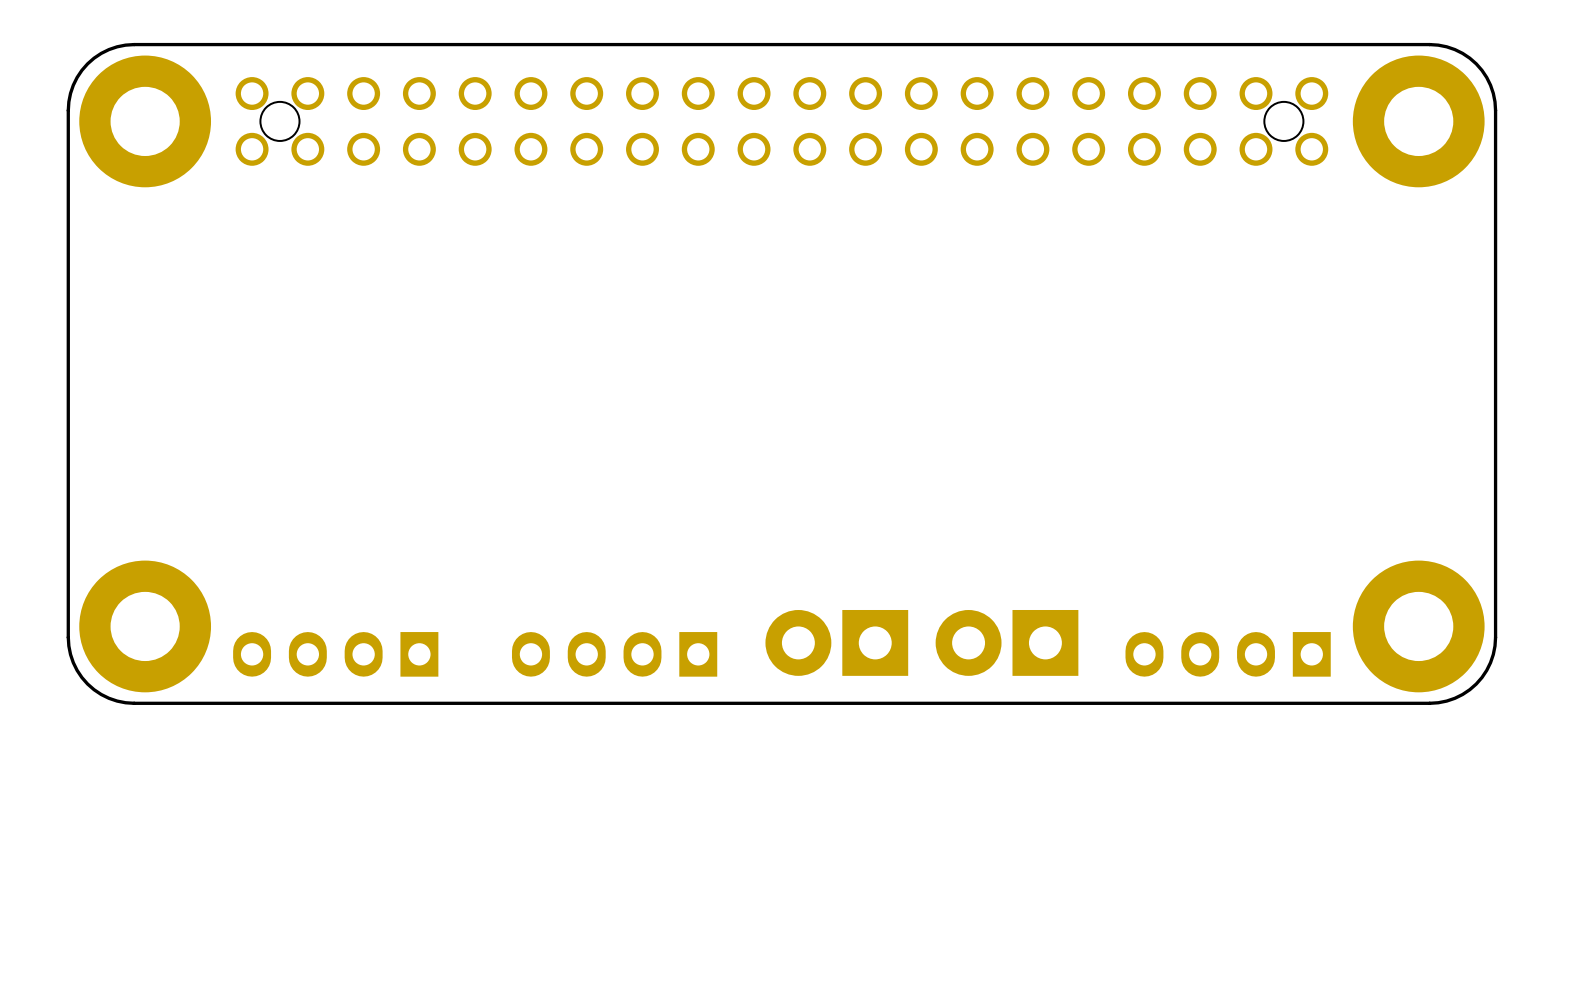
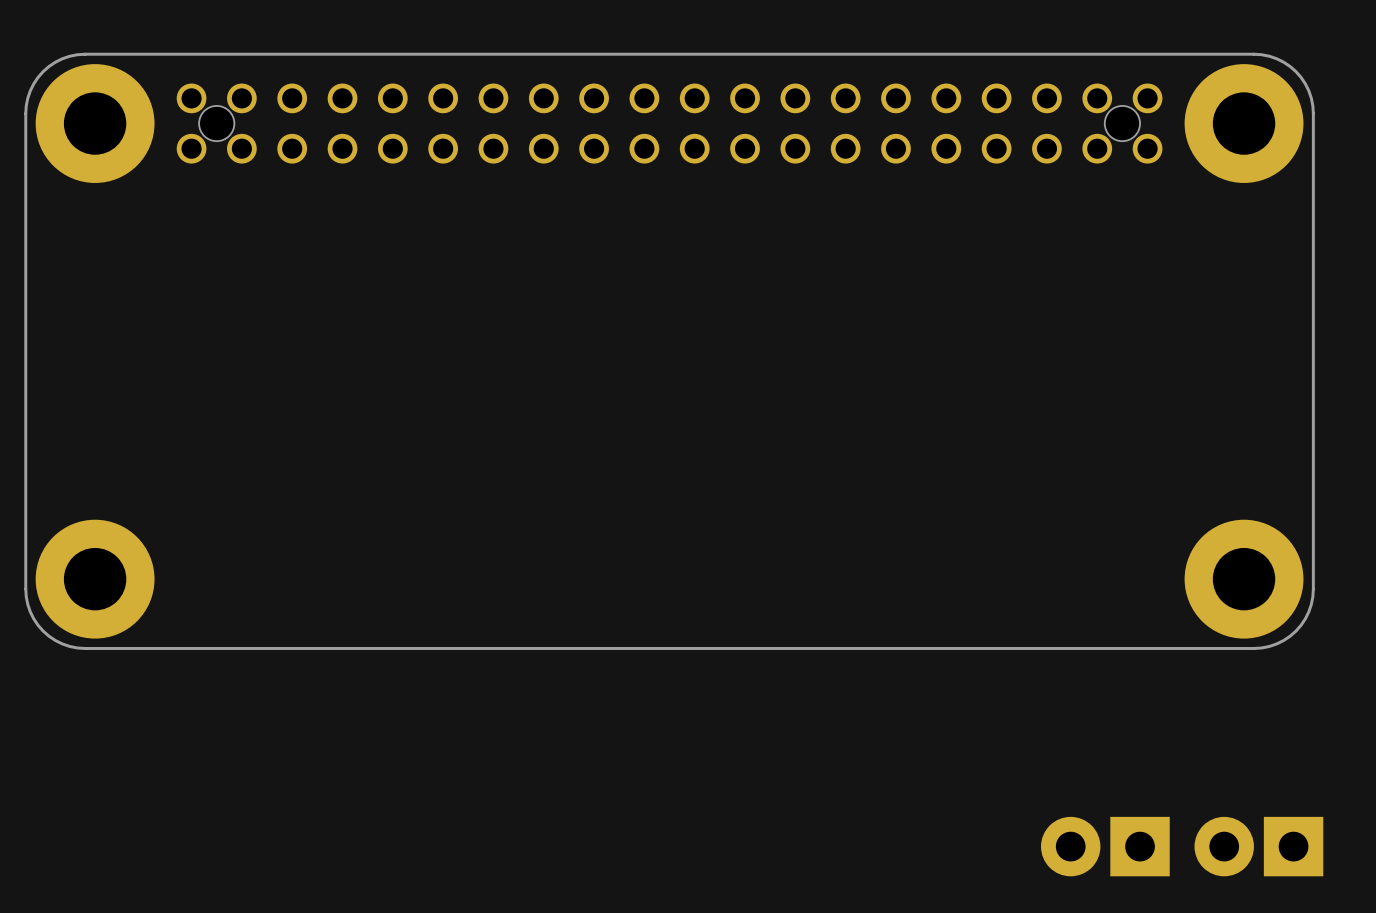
part: (836, 642) -> none
part: (1007, 642) -> none
part: (335, 654) -> none
part: (614, 654) -> none
part: (1228, 654) -> none
part: none -> (1105, 846)
part: none -> (1258, 846)

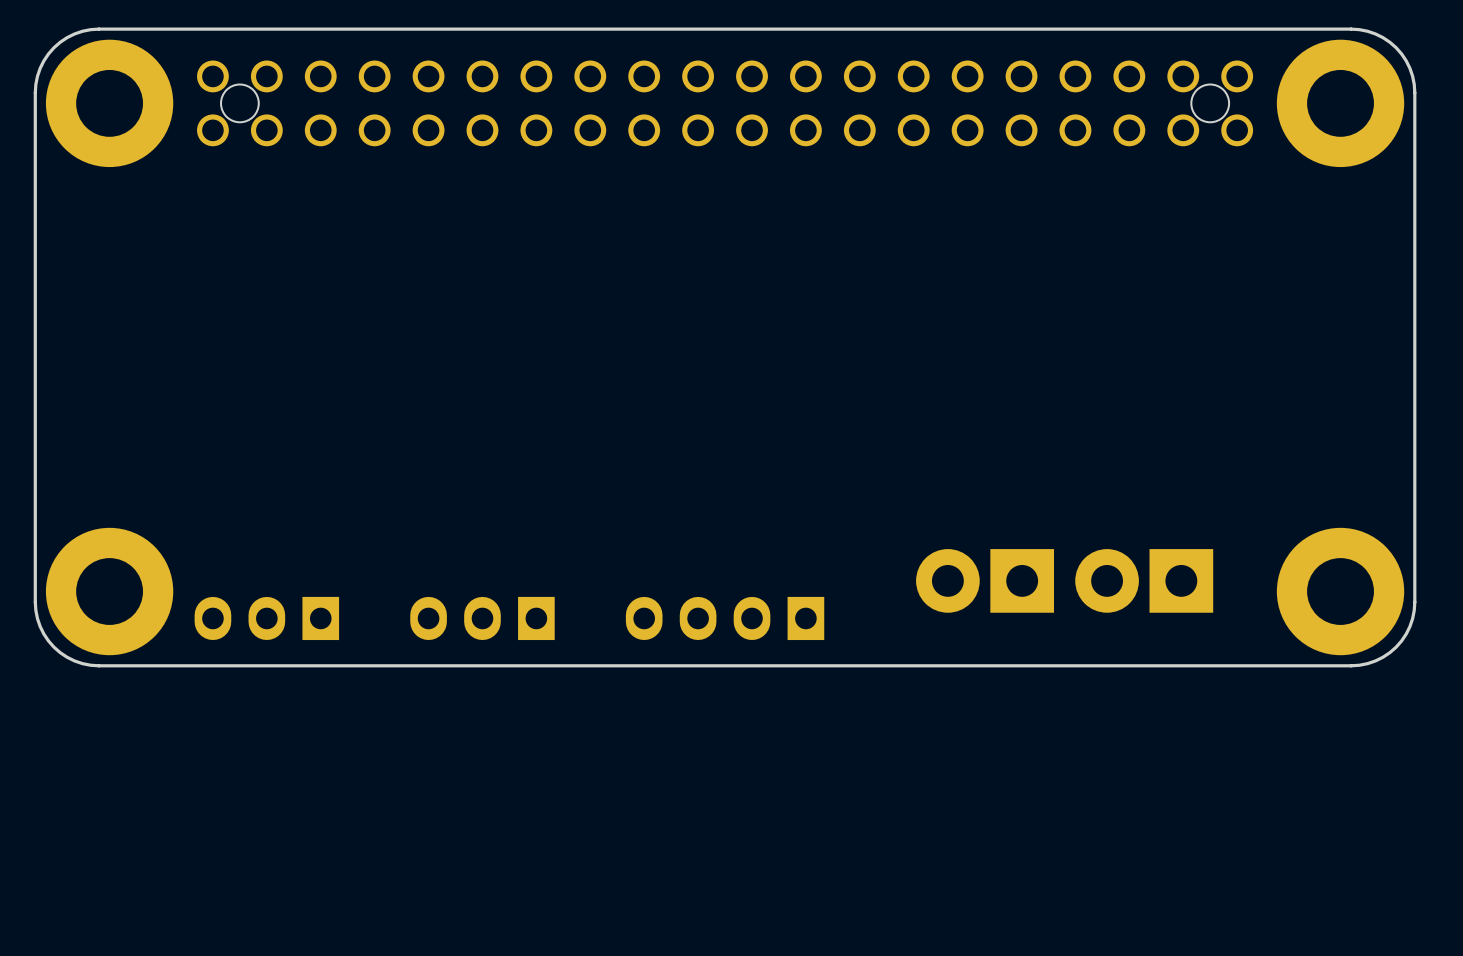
part: none -> (985, 580)
part: none -> (1144, 580)
part: none -> (266, 618)
part: none -> (482, 618)
part: none -> (725, 618)
part: (1105, 846) -> none
part: (1258, 846) -> none

